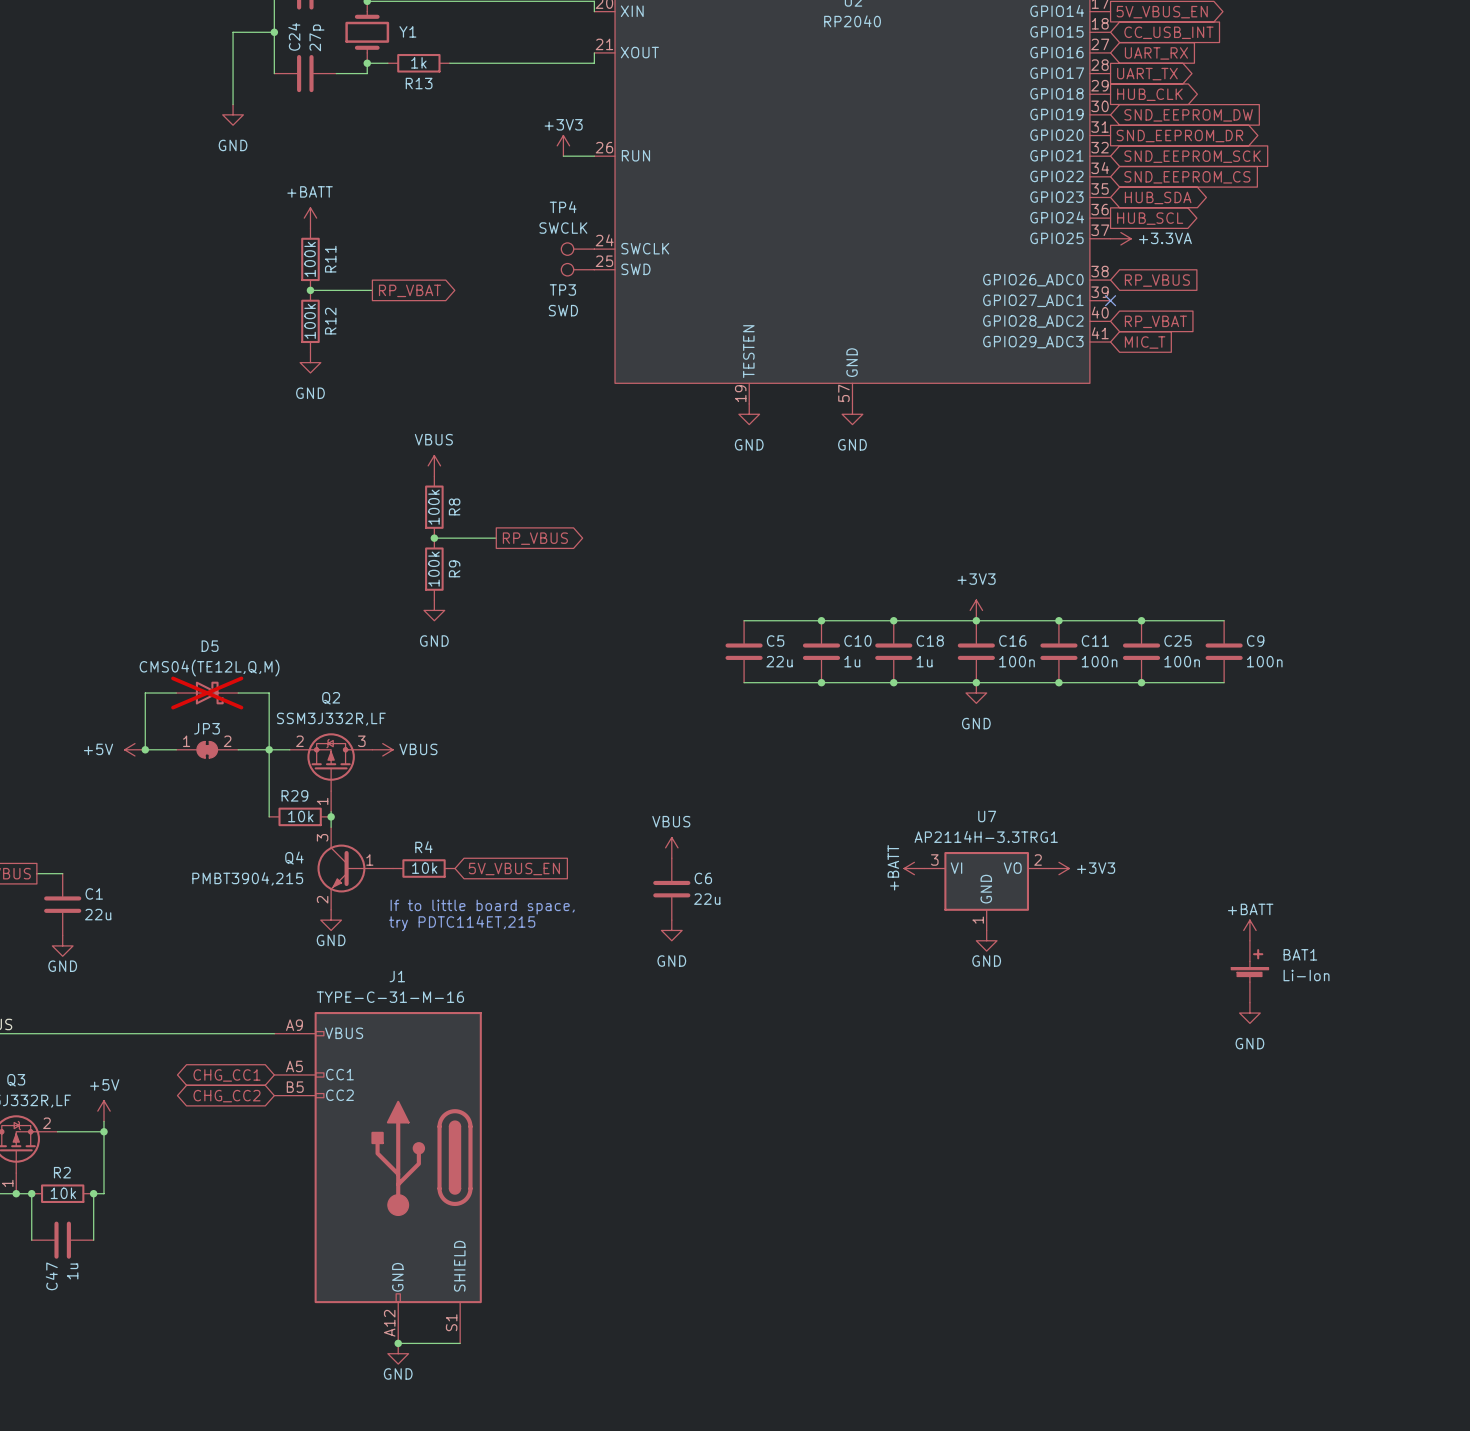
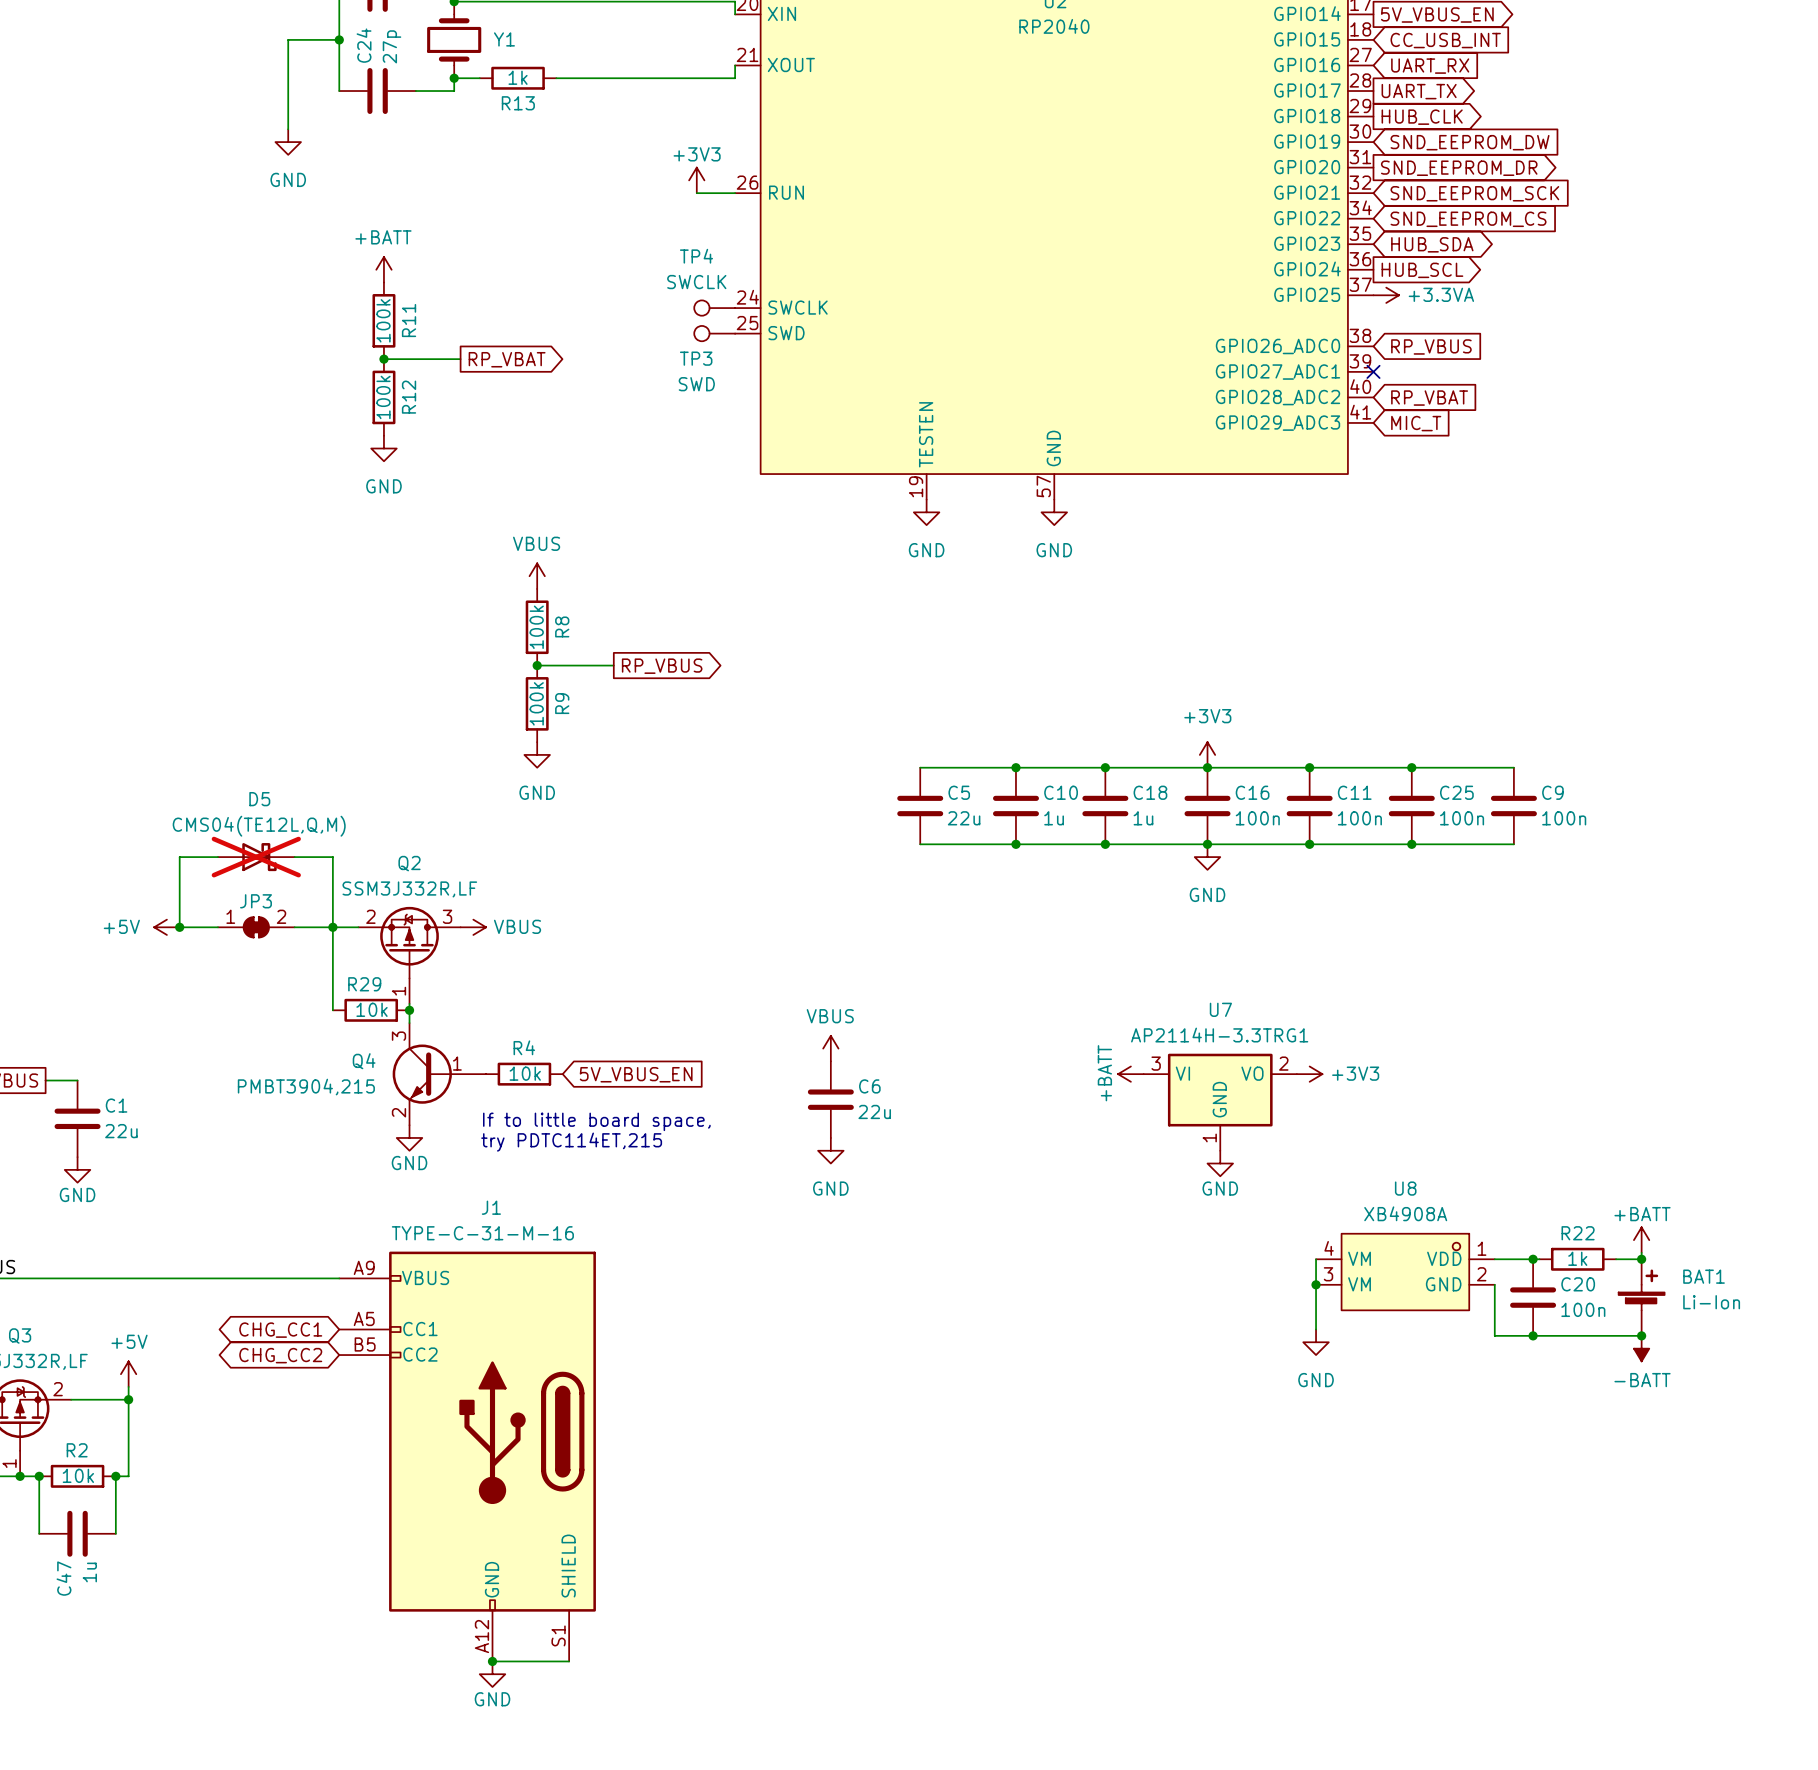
power symbol position: +BATT (1249, 930) -> +BATT (1641, 1240)
BAT1 position: (1249, 971) -> (1641, 1297)
power symbol position: GND (1249, 1013) -> GND (1316, 1342)
wire: none -> (1641, 1252) (1641, 1259) (1616, 1259)
wire: none -> (1316, 1259) (1316, 1329)
wire: none -> (1494, 1259) (1539, 1259)
junction: none -> (1533, 1259)
R22: none -> 1k (1577, 1259)
junction: none -> (1641, 1259)
U8: none -> XB4908A (1405, 1272)
junction: none -> (1316, 1284)
wire: none -> (1494, 1284) (1494, 1335) (1641, 1335)
C20: none -> 100n (1533, 1297)
junction: none -> (1533, 1335)
junction: none -> (1641, 1335)
power symbol: none -> -BATT (1641, 1348)

